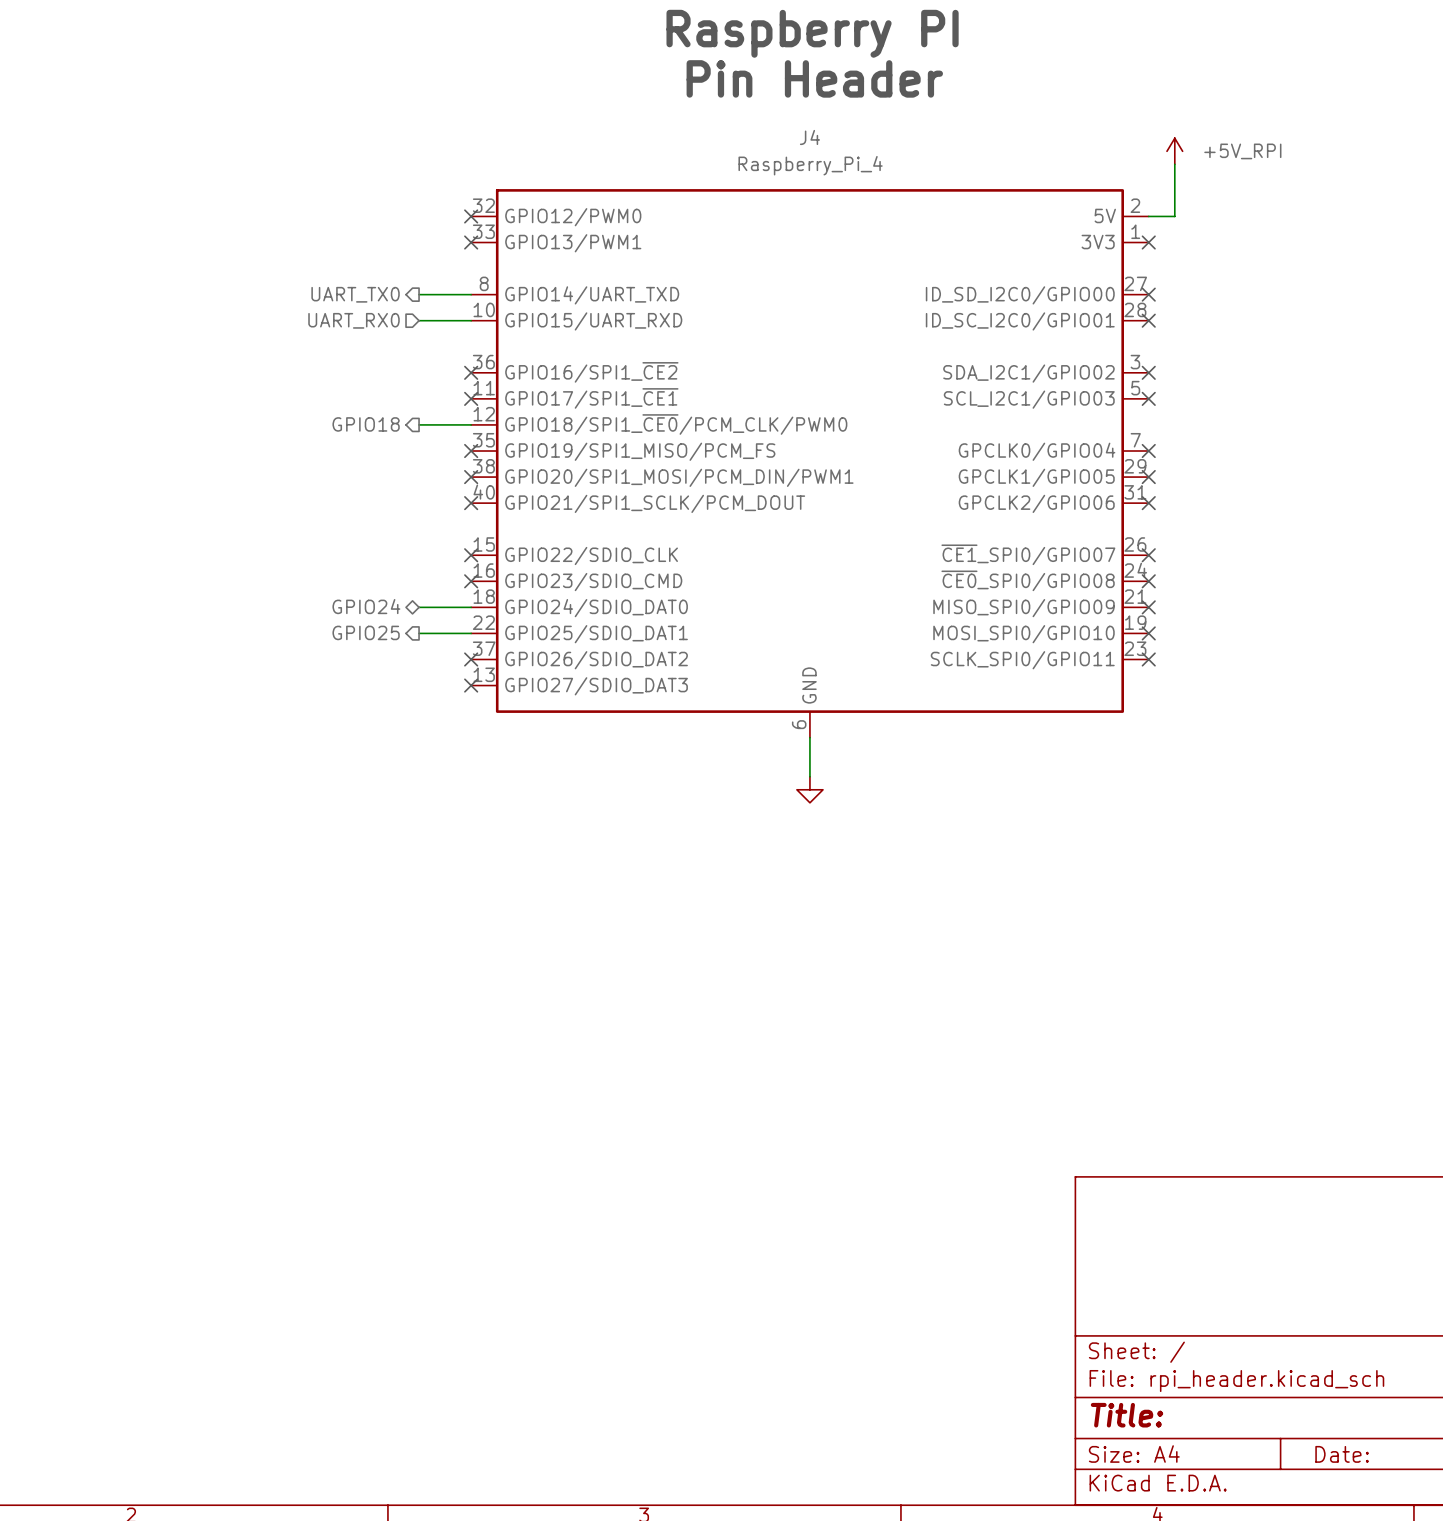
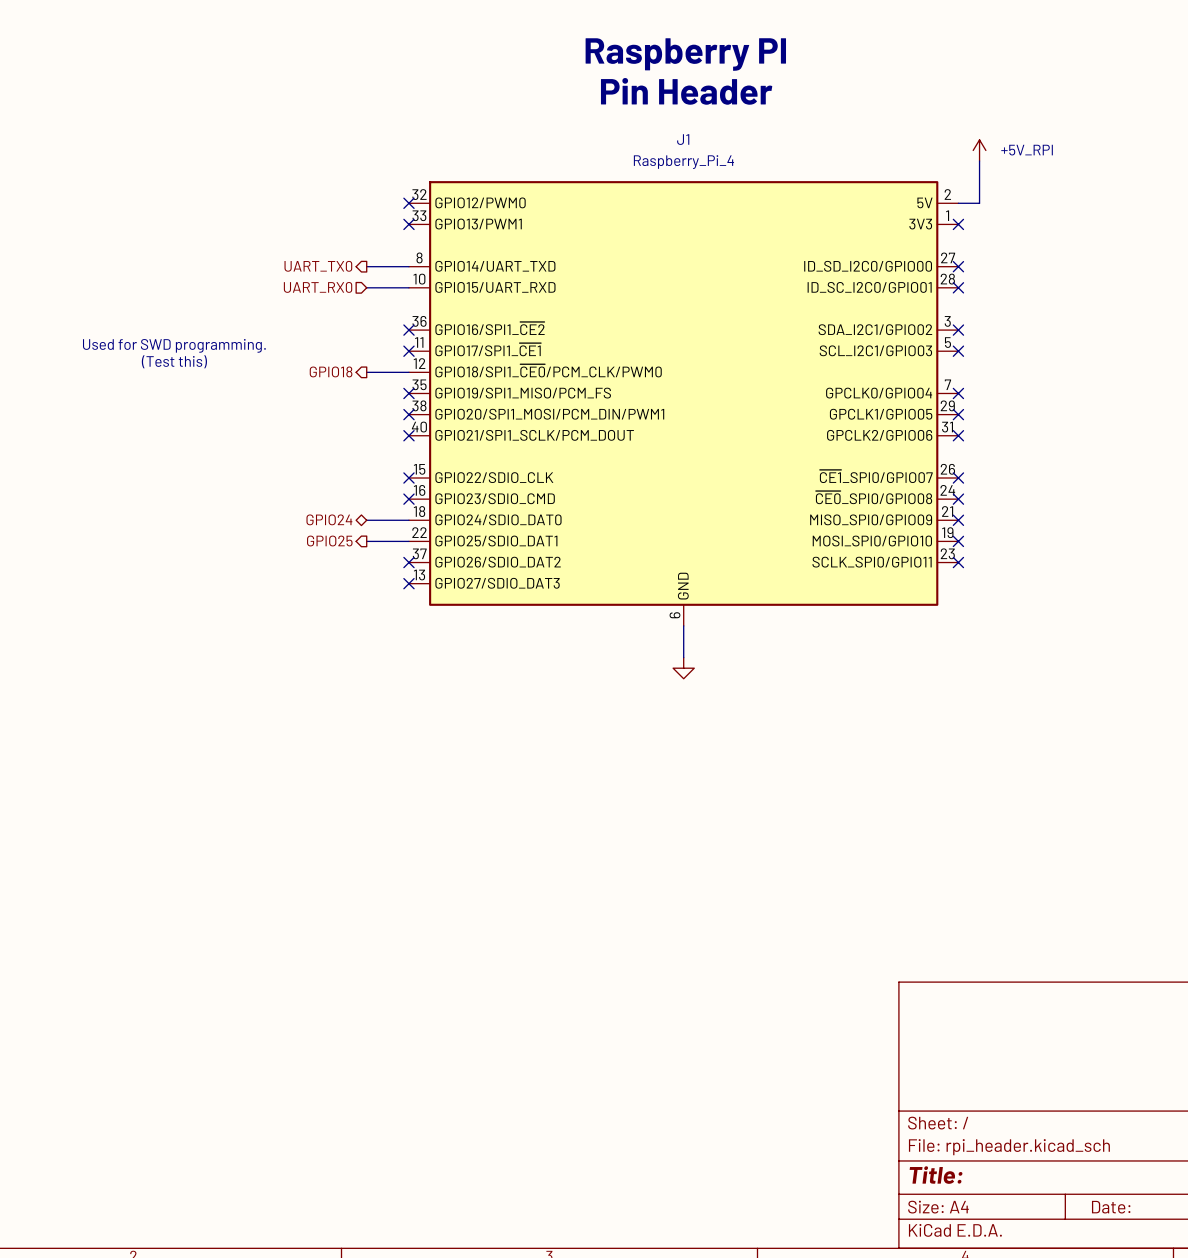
J4 name: J4 (809, 137) -> J1 (683, 139)
text: none -> Used for SWD programming. (174, 345)
text: none -> (Test this) (174, 361)

